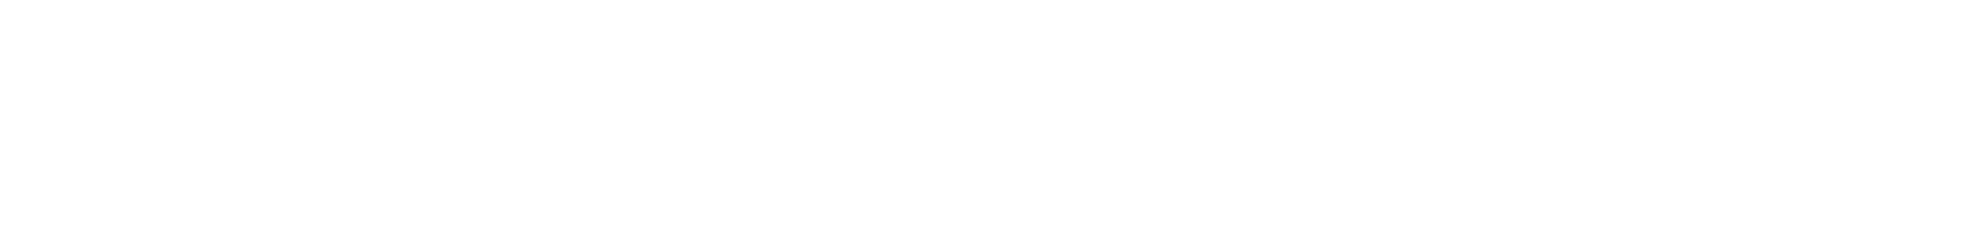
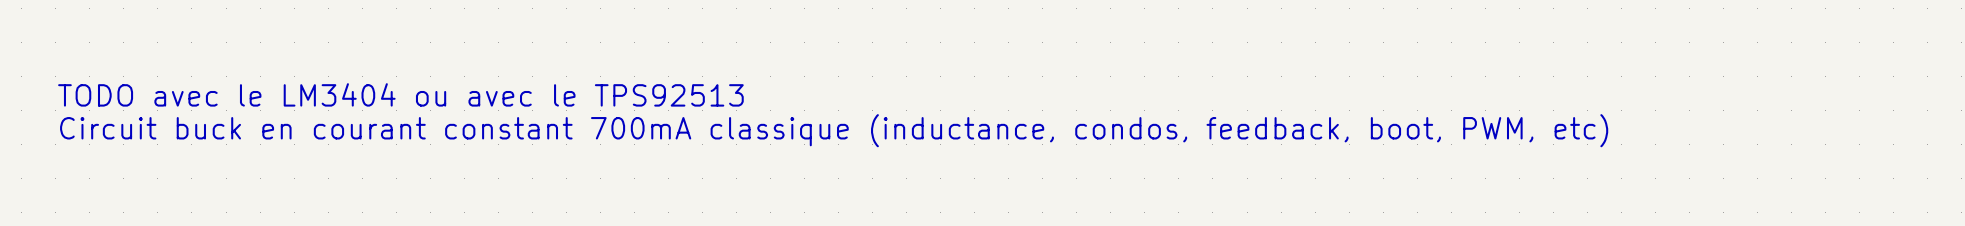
text: none -> TODO avec le LM3404 ou avec le TPS92513 (400, 94)
text: none -> Circuit buck en courant constant 700mA classique (inductance, condos, feedback, boot, PWM, etc) (834, 130)

